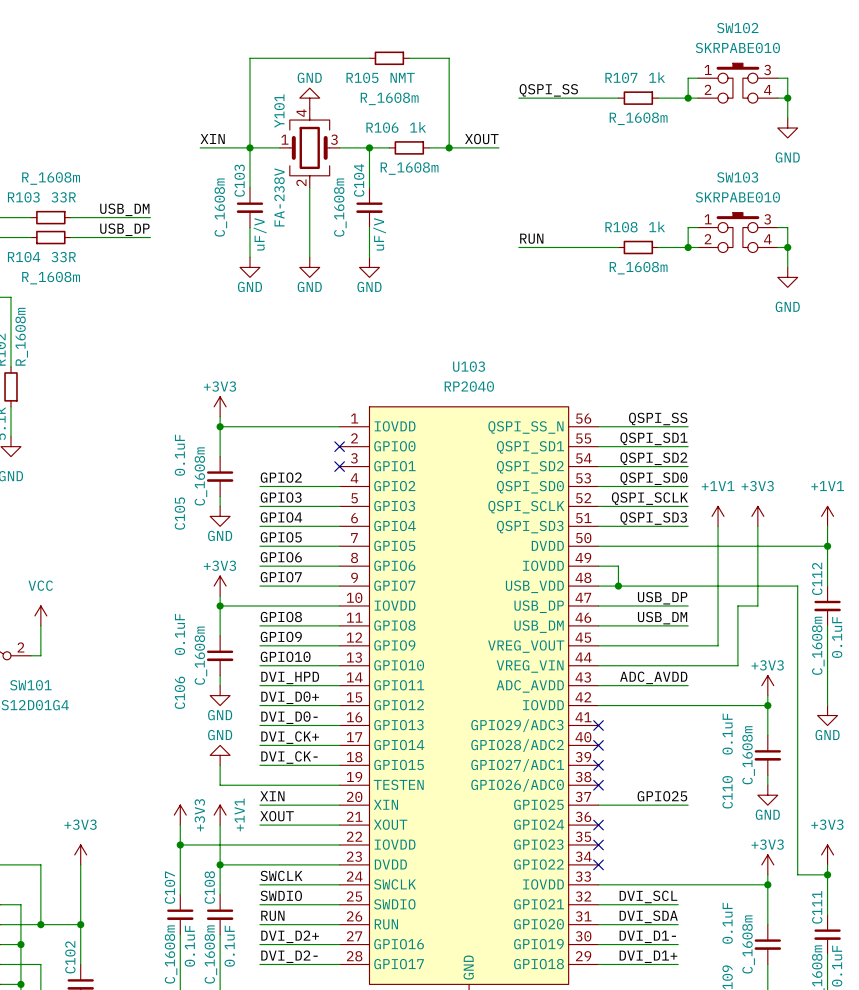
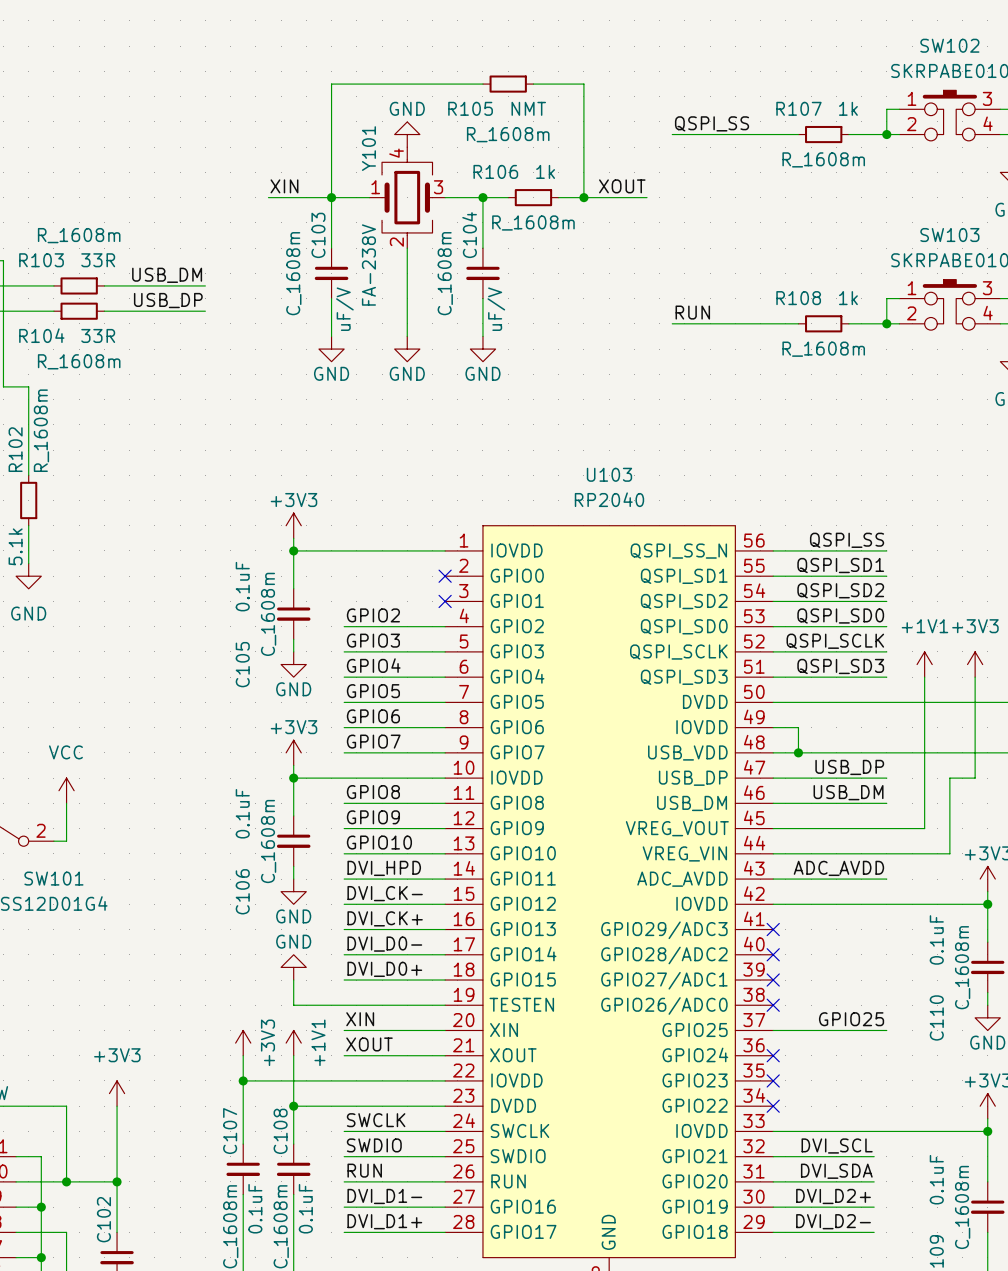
label: DVI_D0+ (290, 697) -> DVI_CK- (385, 893)
label: DVI_D0- (289, 717) -> DVI_CK+ (385, 918)
label: DVI_CK+ (290, 737) -> DVI_D0- (384, 944)
label: DVI_CK- (289, 757) -> DVI_D0+ (384, 969)
label: DVI_D2+ (290, 936) -> DVI_D1- (384, 1196)
label: DVI_D1- (647, 936) -> DVI_D2+ (833, 1196)
label: DVI_D2- (289, 956) -> DVI_D1+ (384, 1221)
label: DVI_D1+ (648, 956) -> DVI_D2- (833, 1221)

